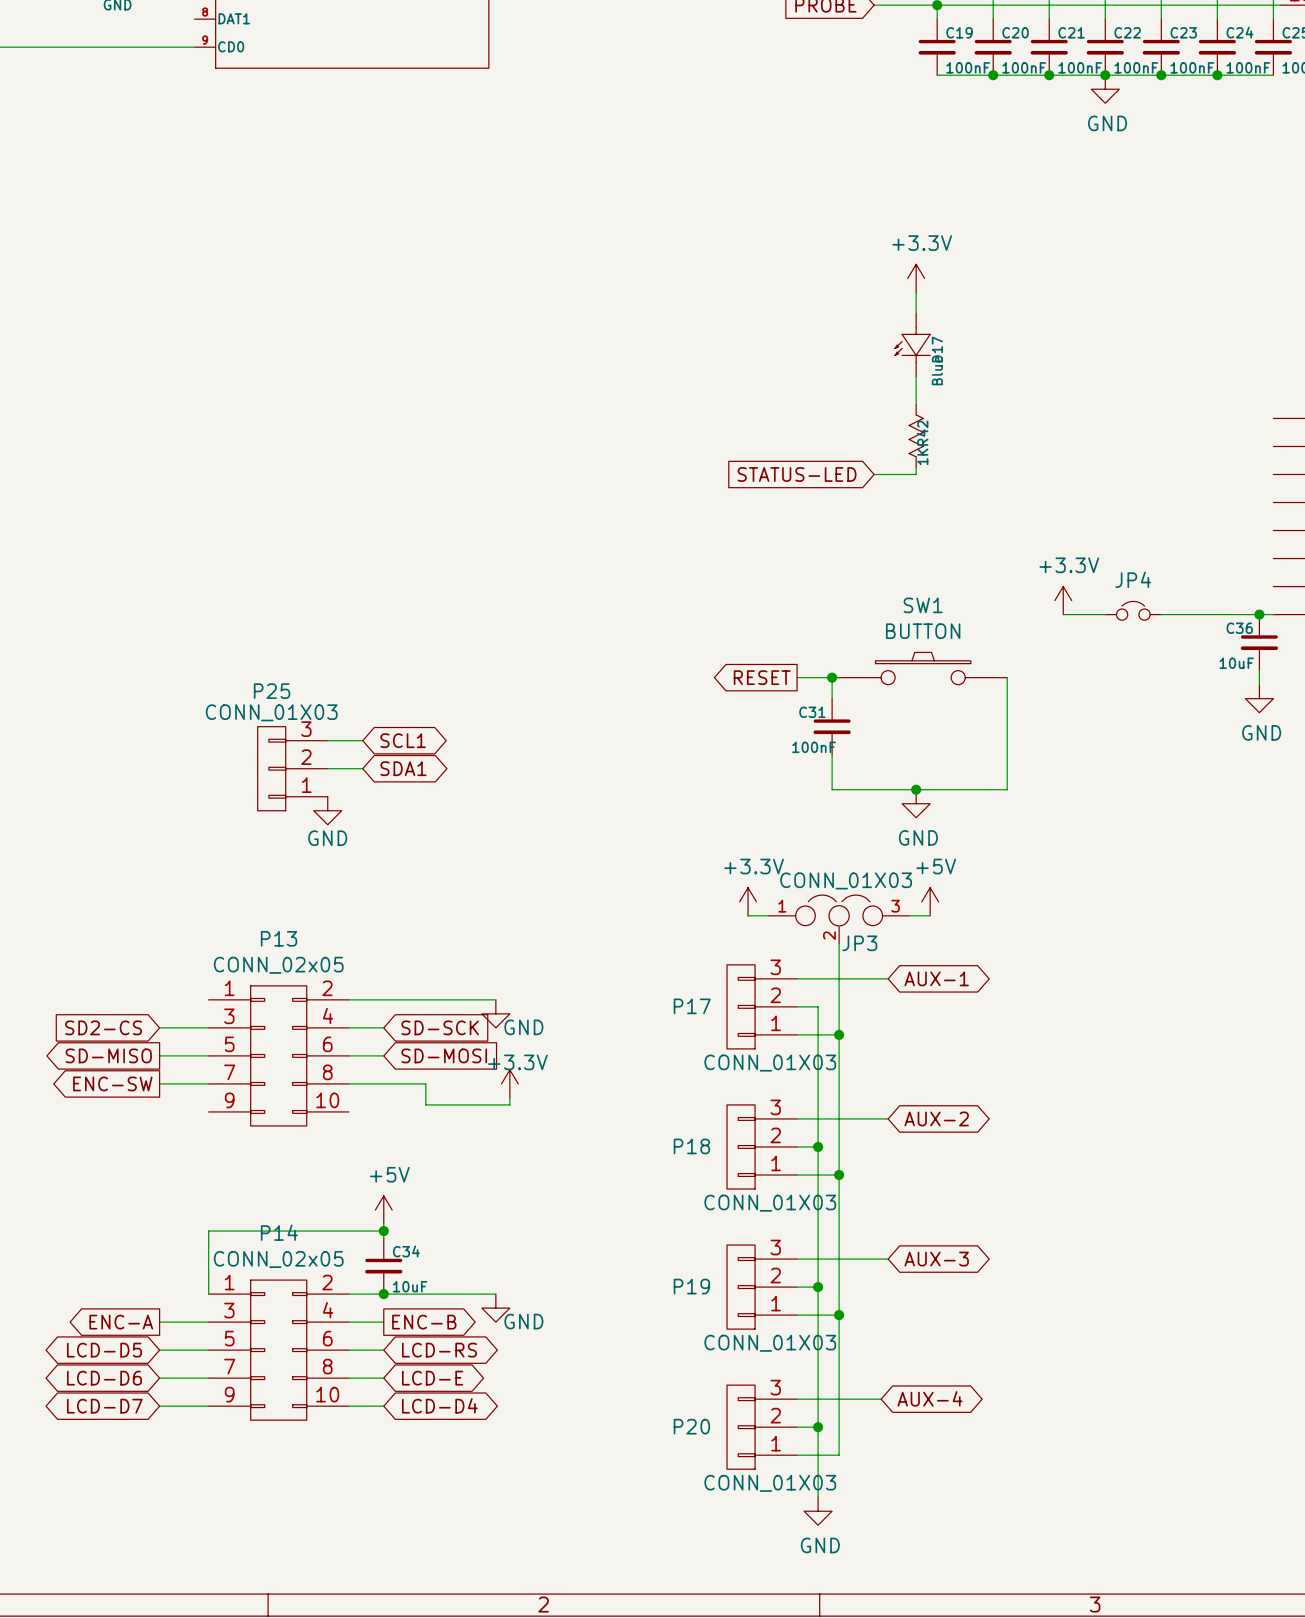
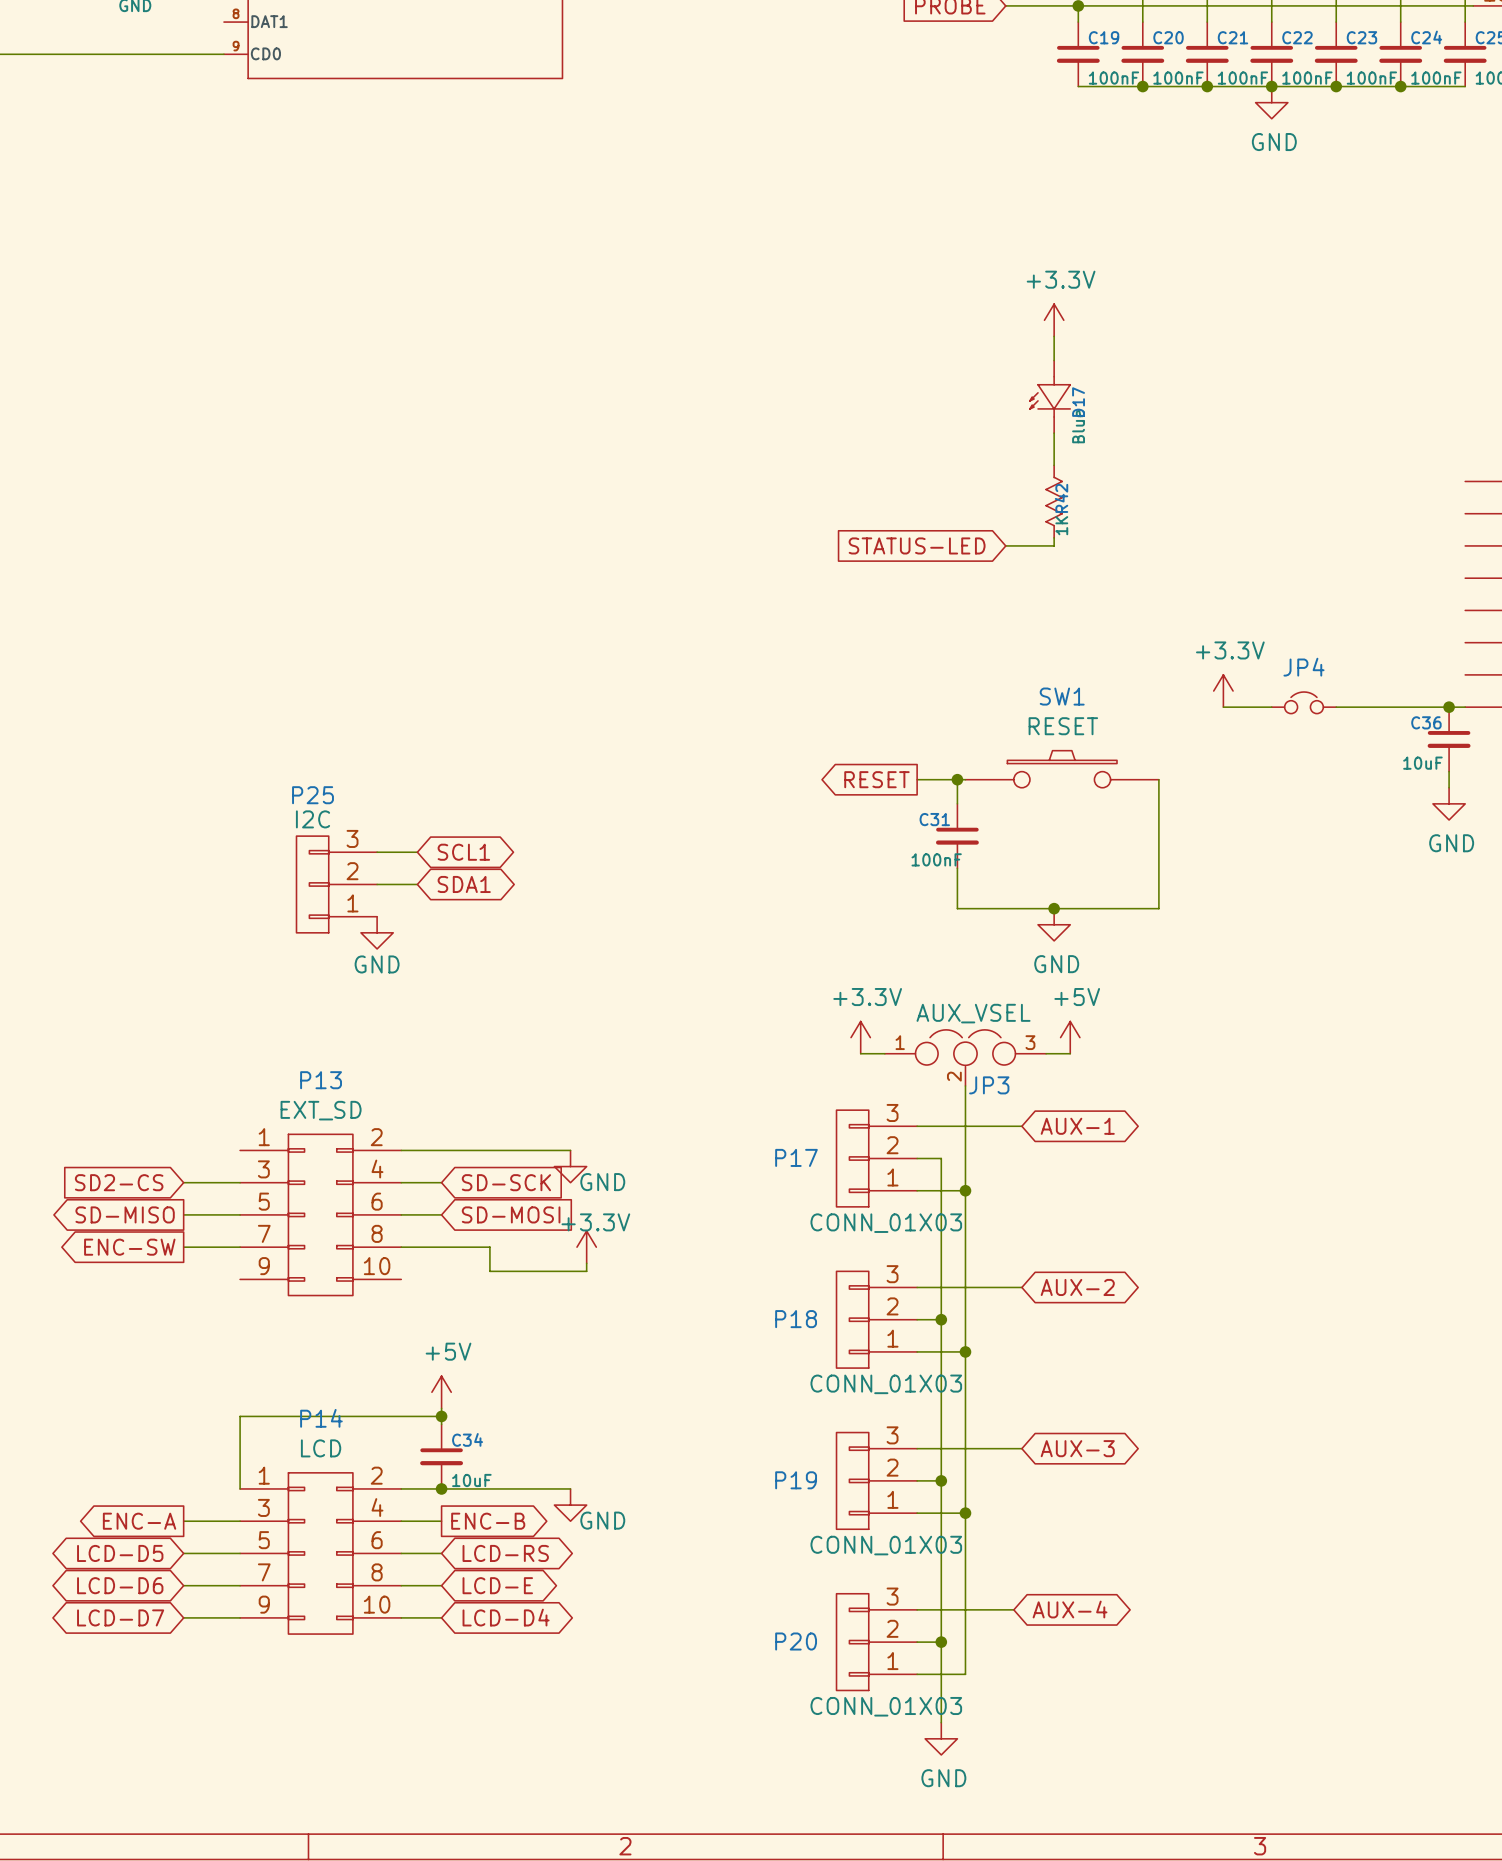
SW1 value: BUTTON (923, 631) -> RESET (1063, 726)
P25 value: CONN_01X03 (271, 712) -> I2C (313, 819)
JP3 value: CONN_01X03 (846, 880) -> AUX_VSEL (973, 1013)
P13 value: CONN_02x05 (278, 965) -> EXT_SD (321, 1110)
P14 value: CONN_02x05 (278, 1259) -> LCD (321, 1448)

